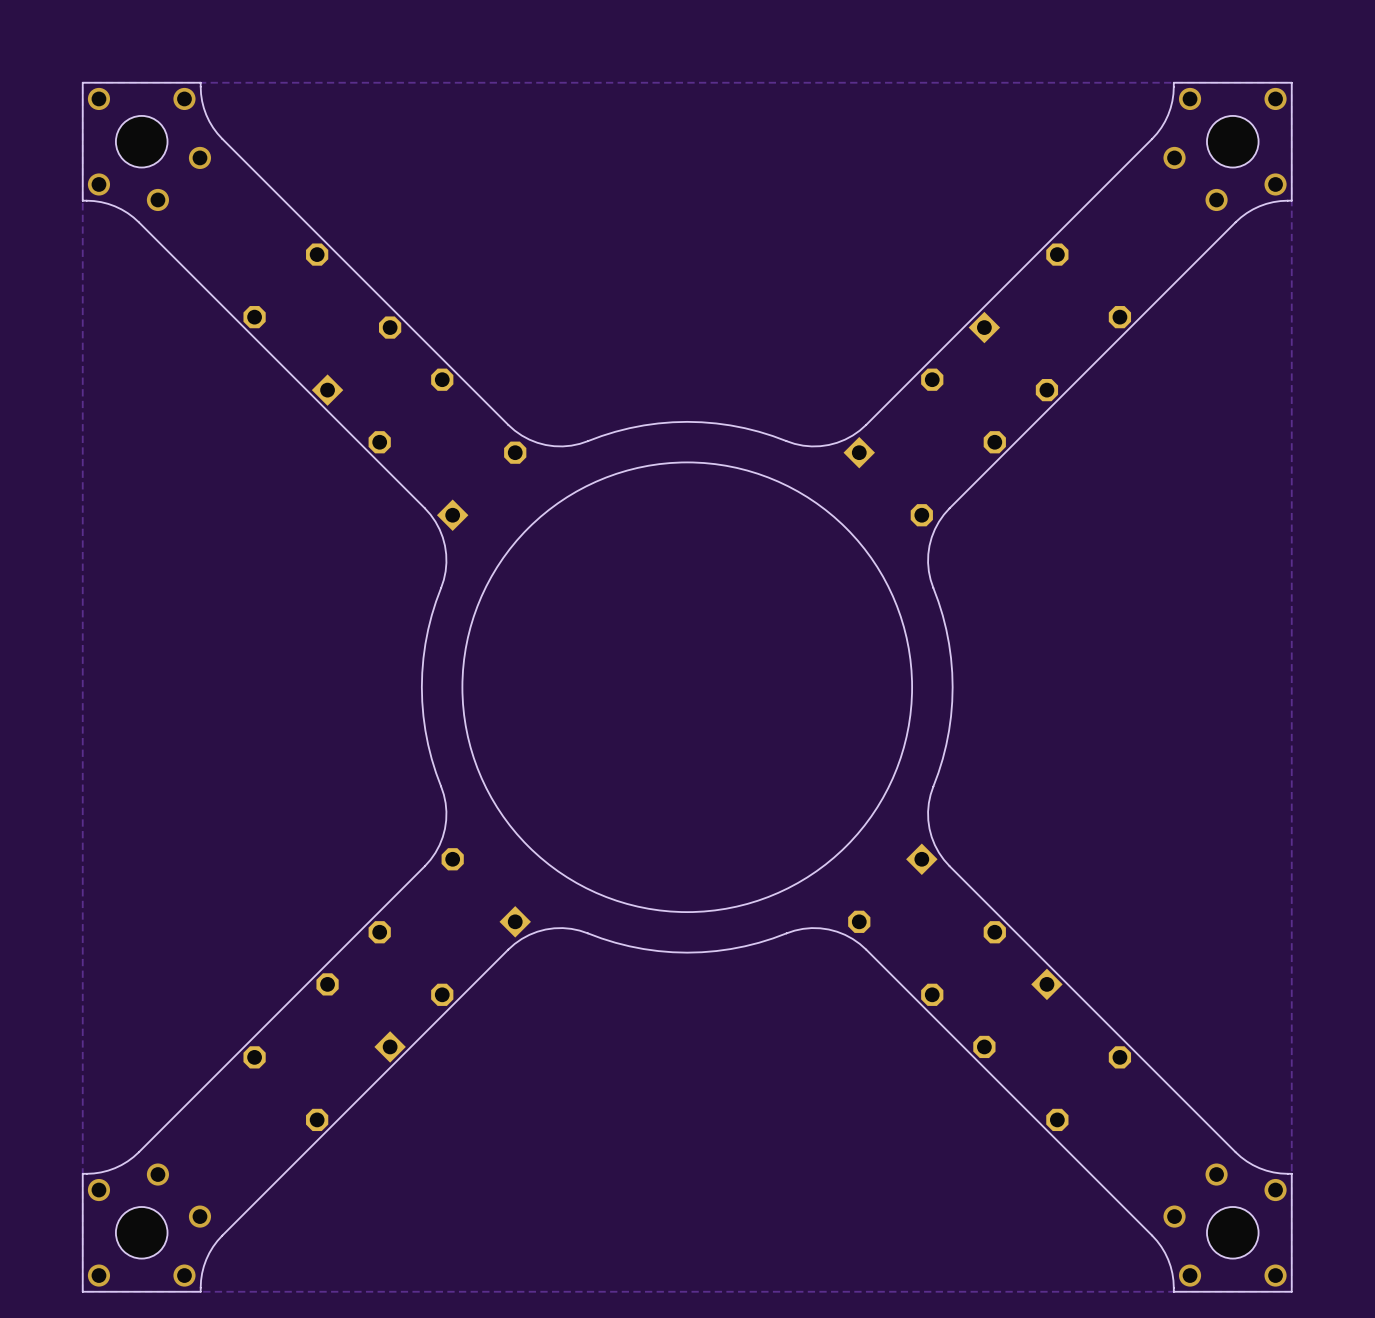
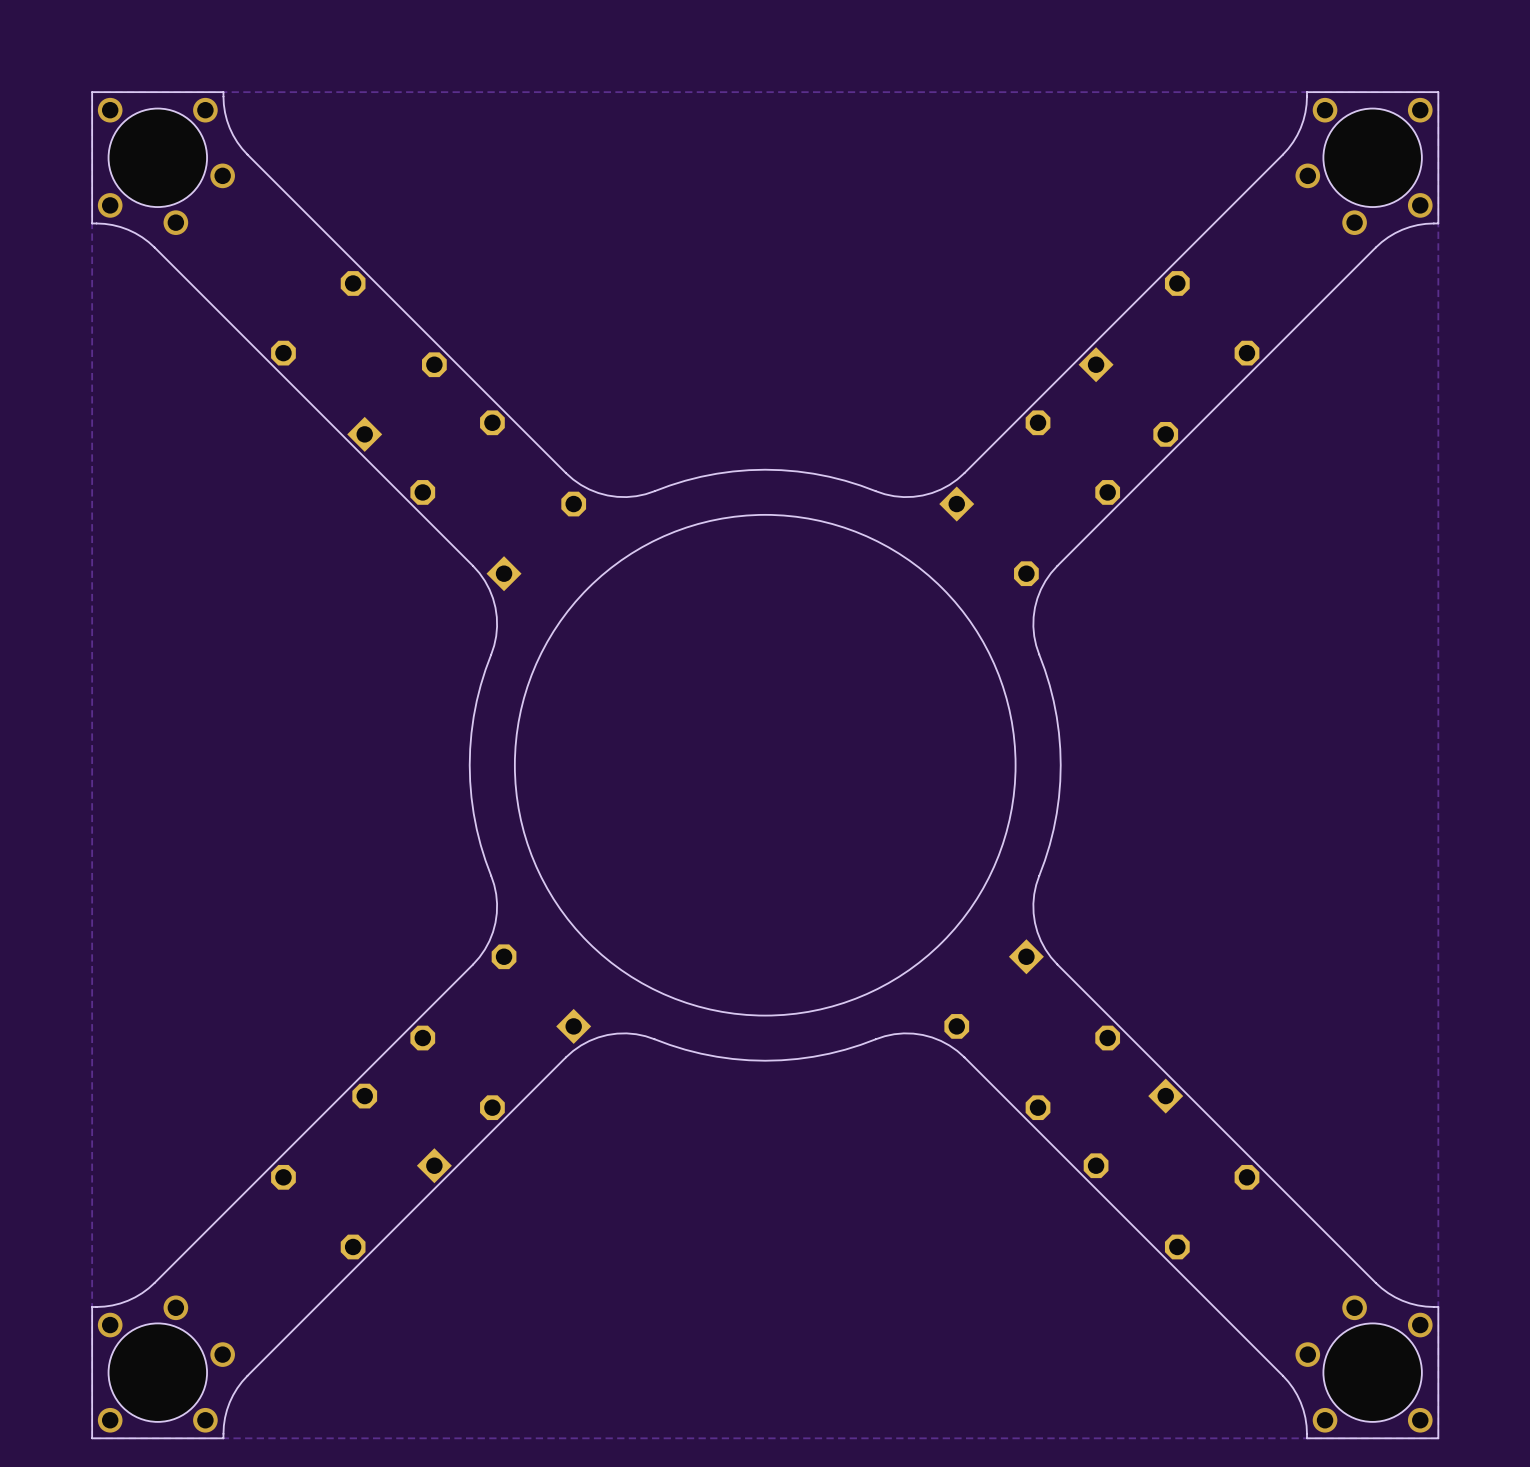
hole size: [115, 115, 168, 168] -> [108, 108, 208, 208]
hole size: [1206, 115, 1259, 168] -> [1323, 108, 1422, 208]
hole size: [115, 1206, 168, 1259] -> [108, 1323, 208, 1422]
hole size: [1206, 1206, 1259, 1259] -> [1323, 1323, 1422, 1422]

